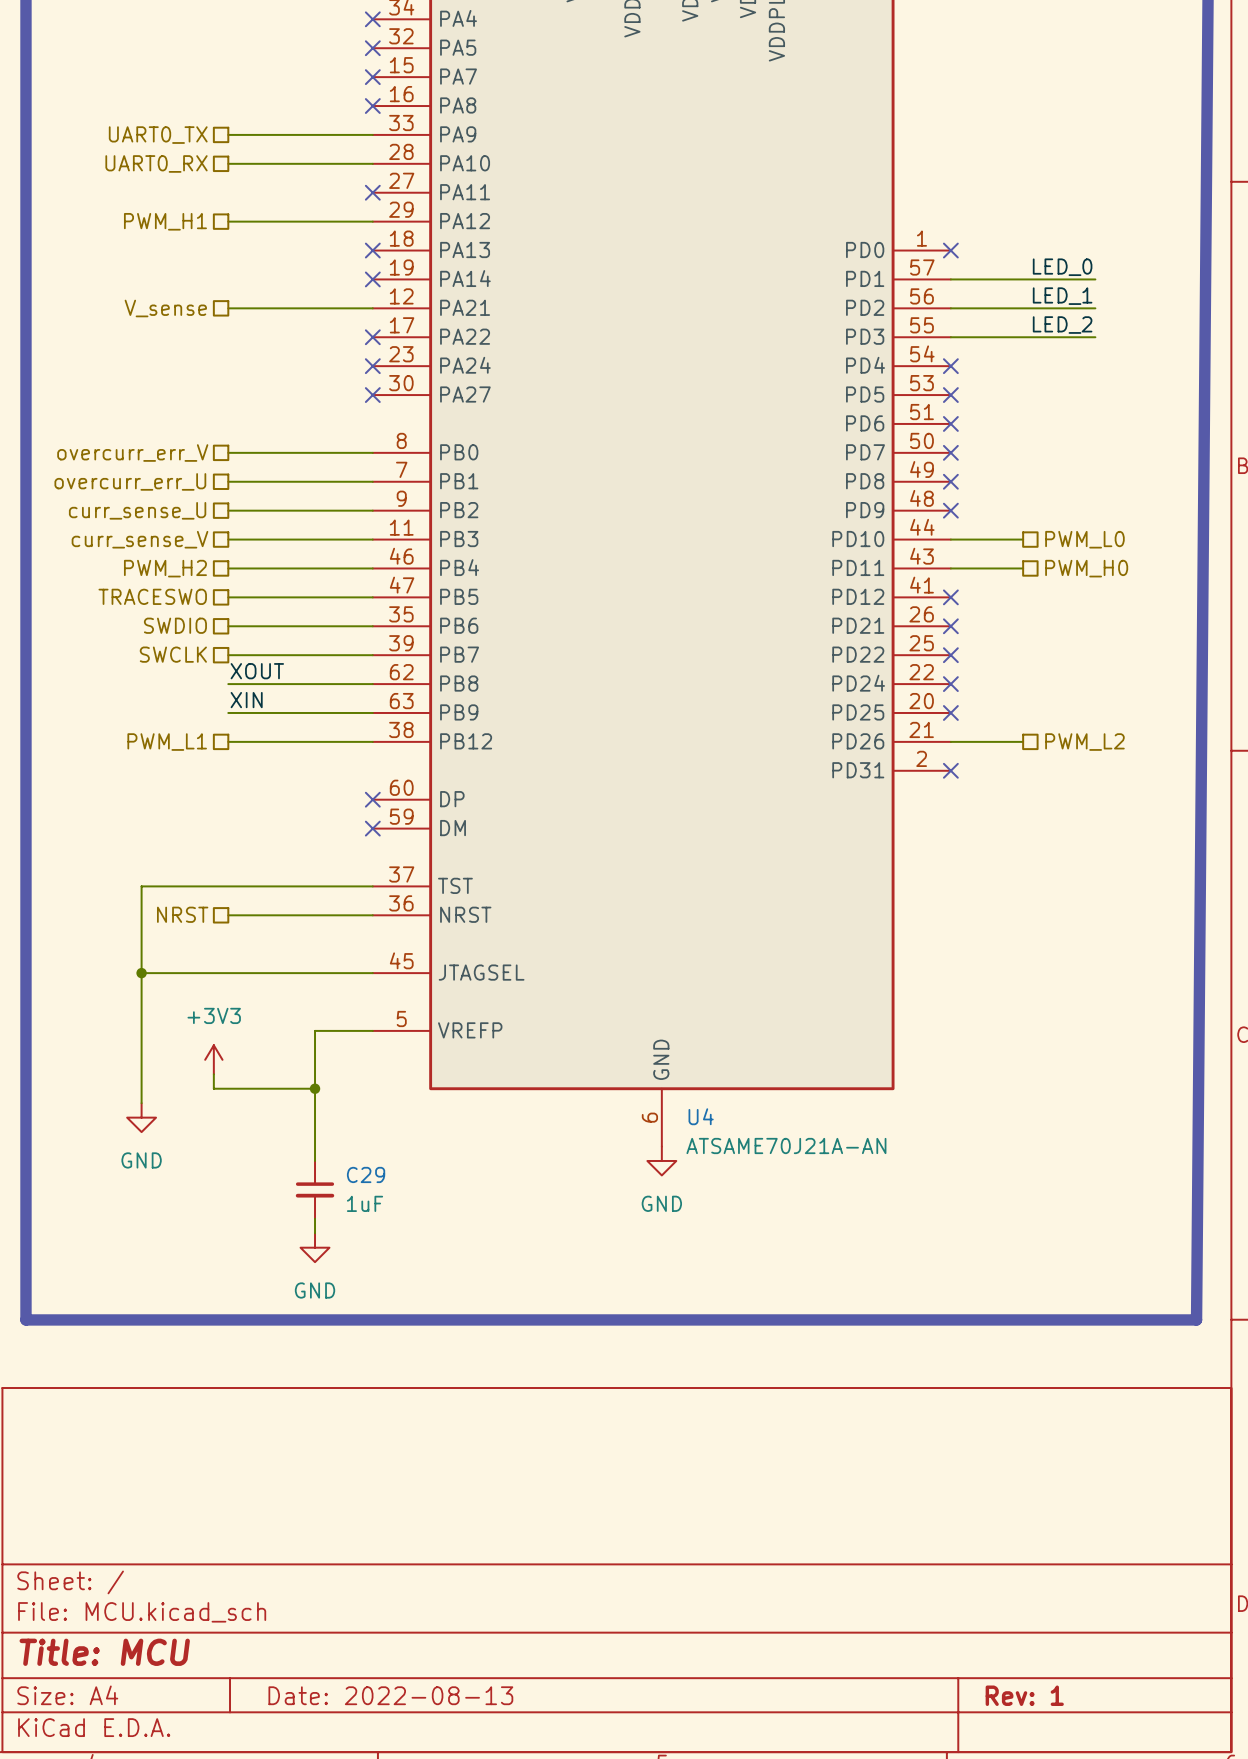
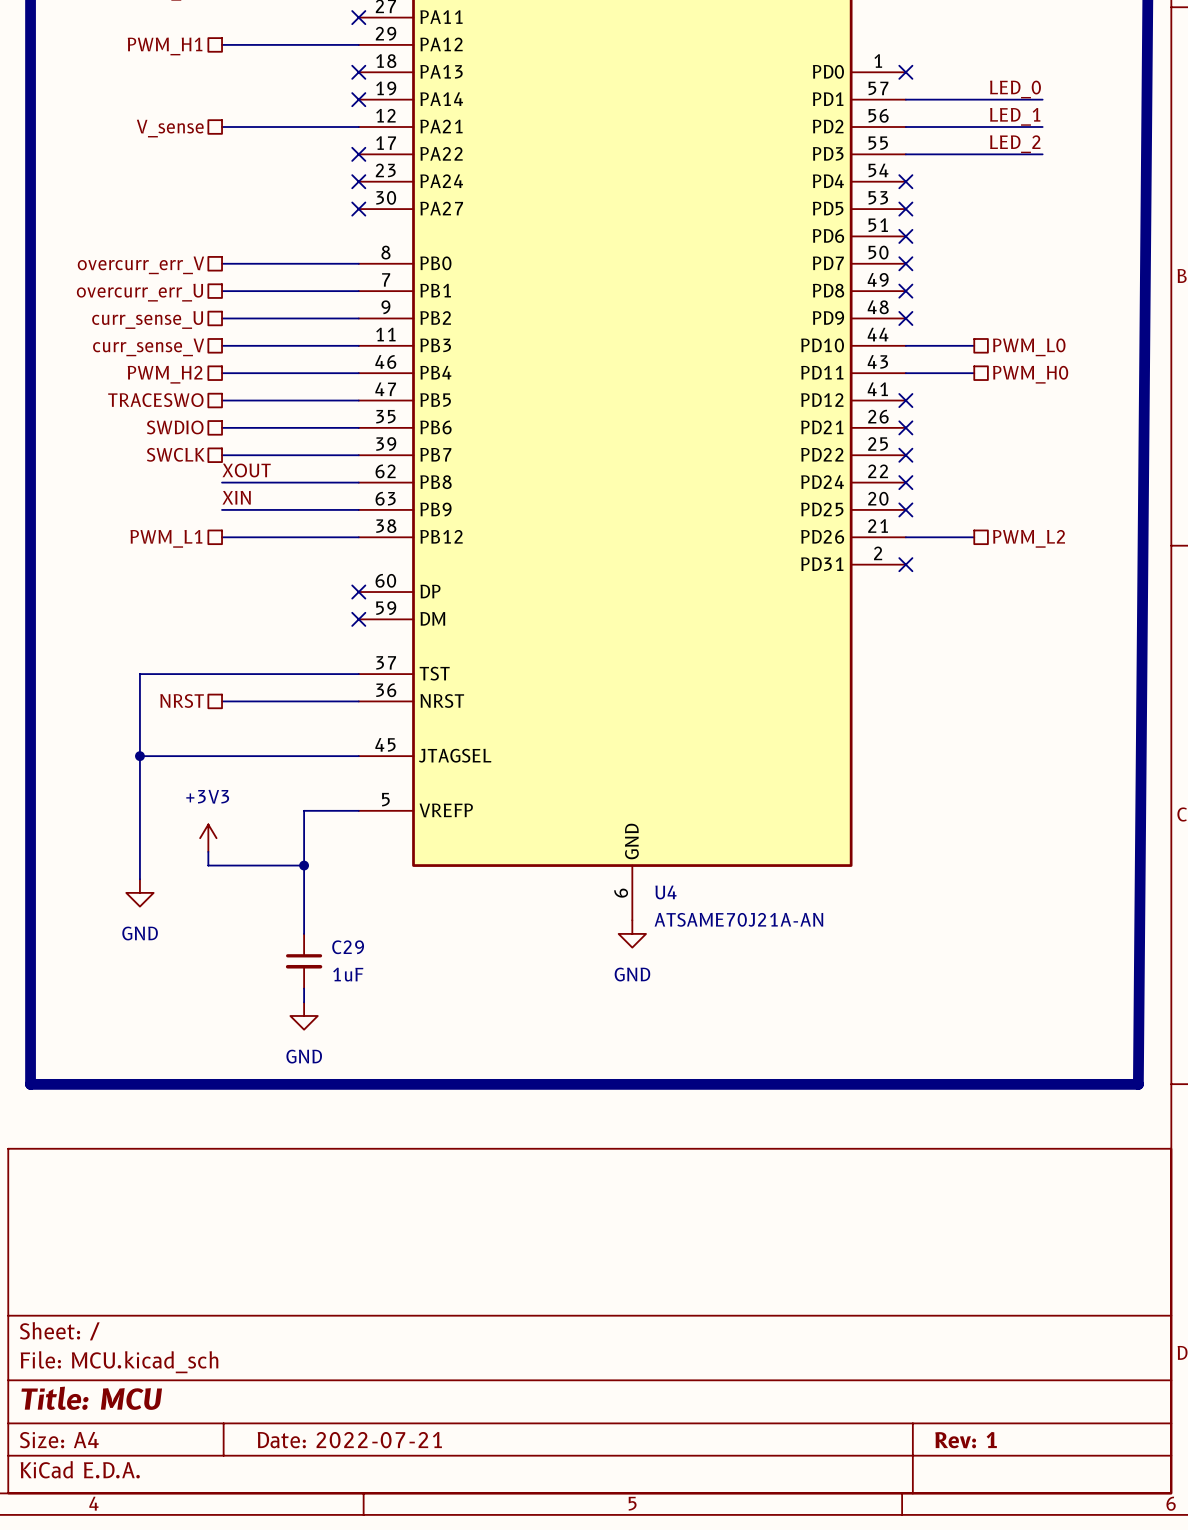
title block: Date: 2022-08-13 (390, 1695) -> Date: 2022-07-21 (349, 1440)

